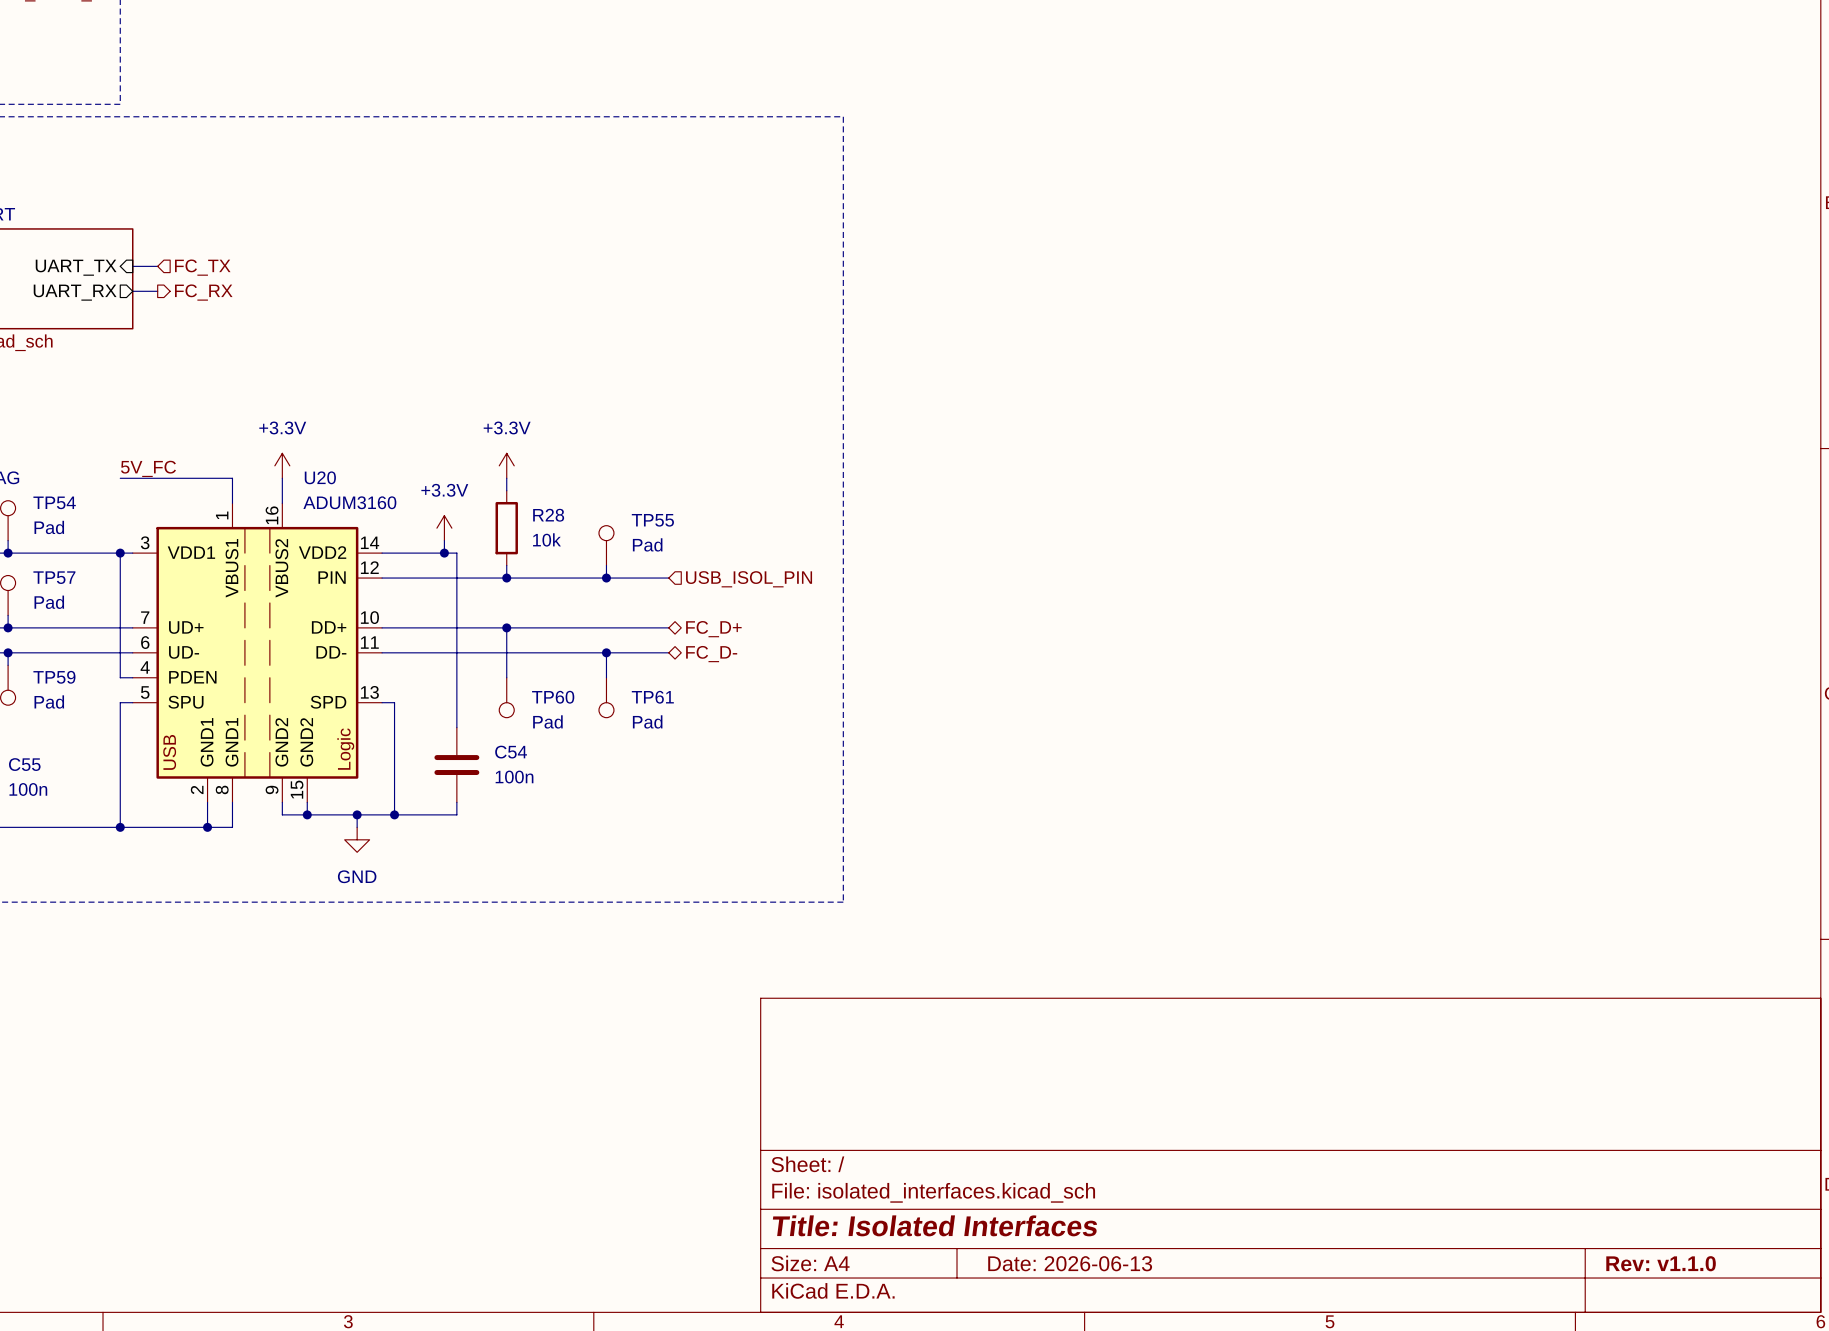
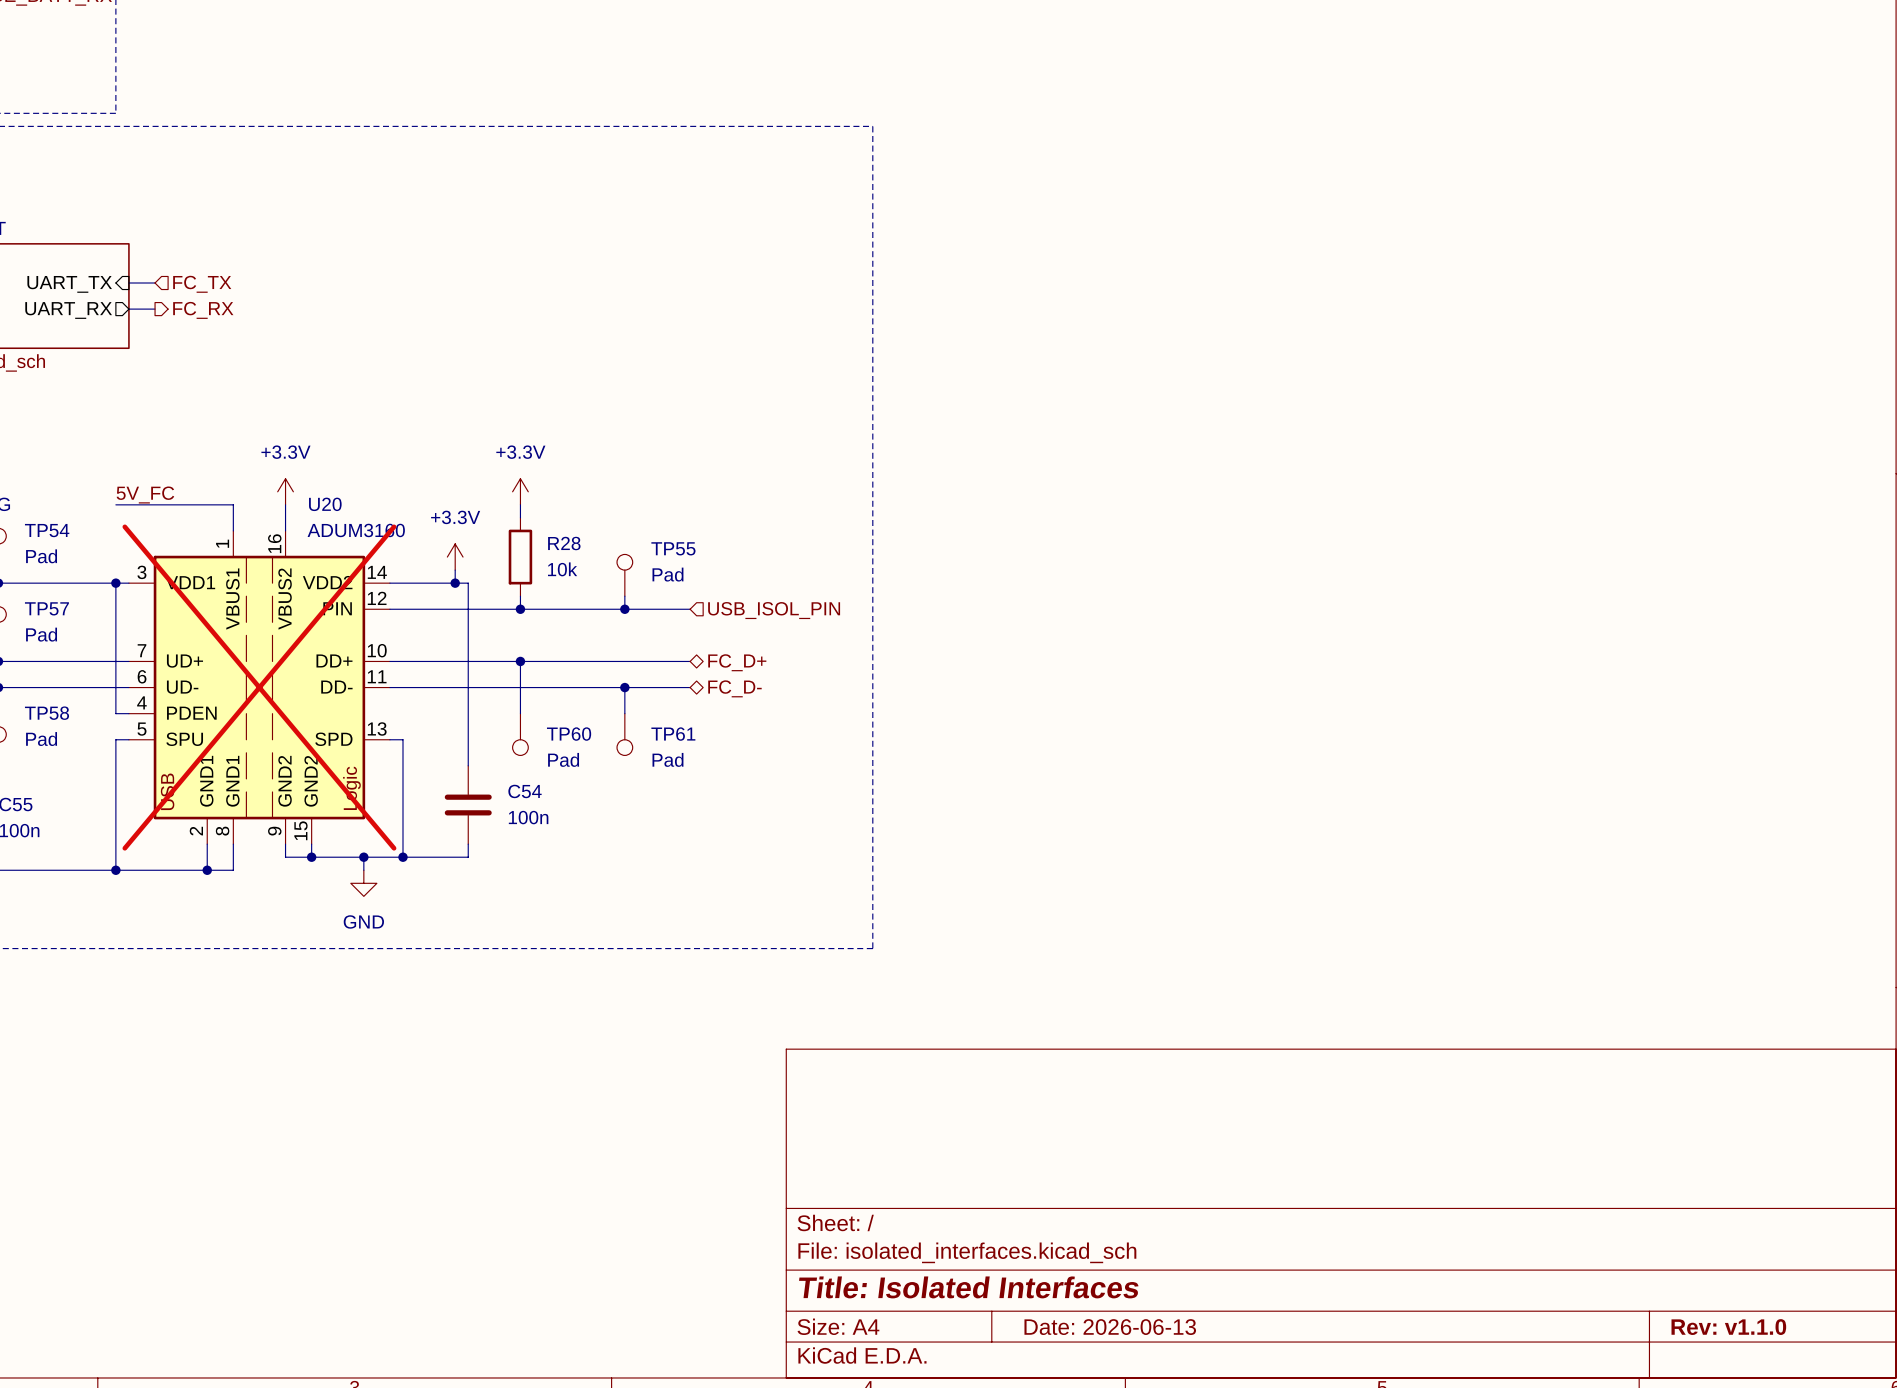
U20 do-not-place cross: none -> (259, 687)
TP59 name: TP59 (54, 677) -> TP58 (47, 713)

